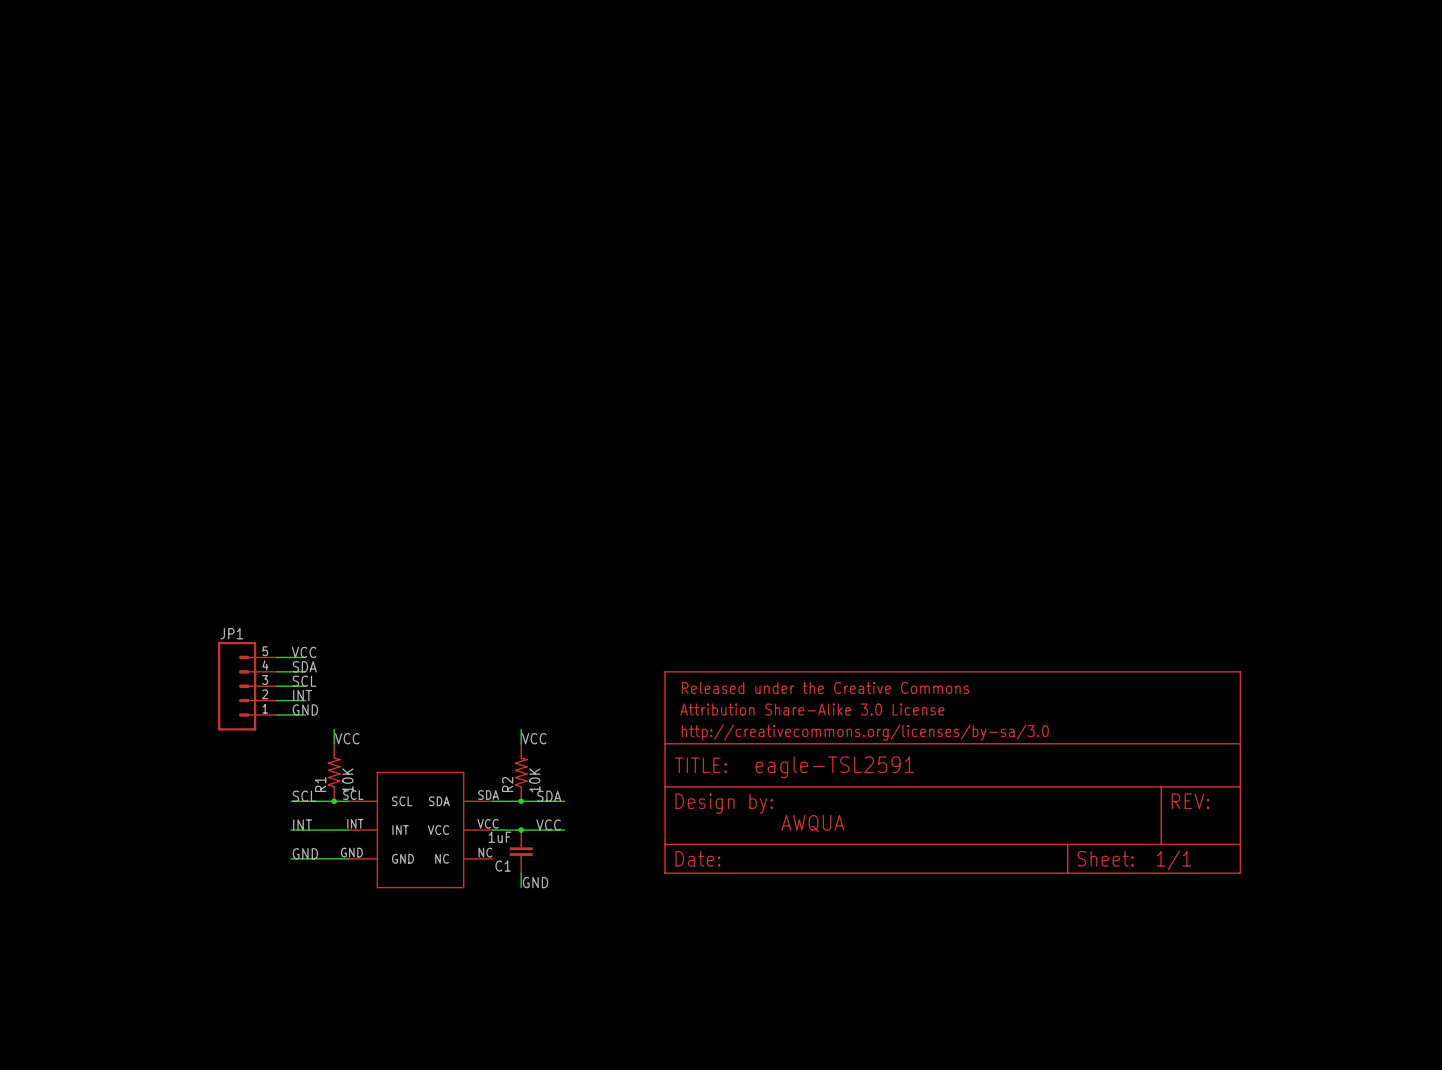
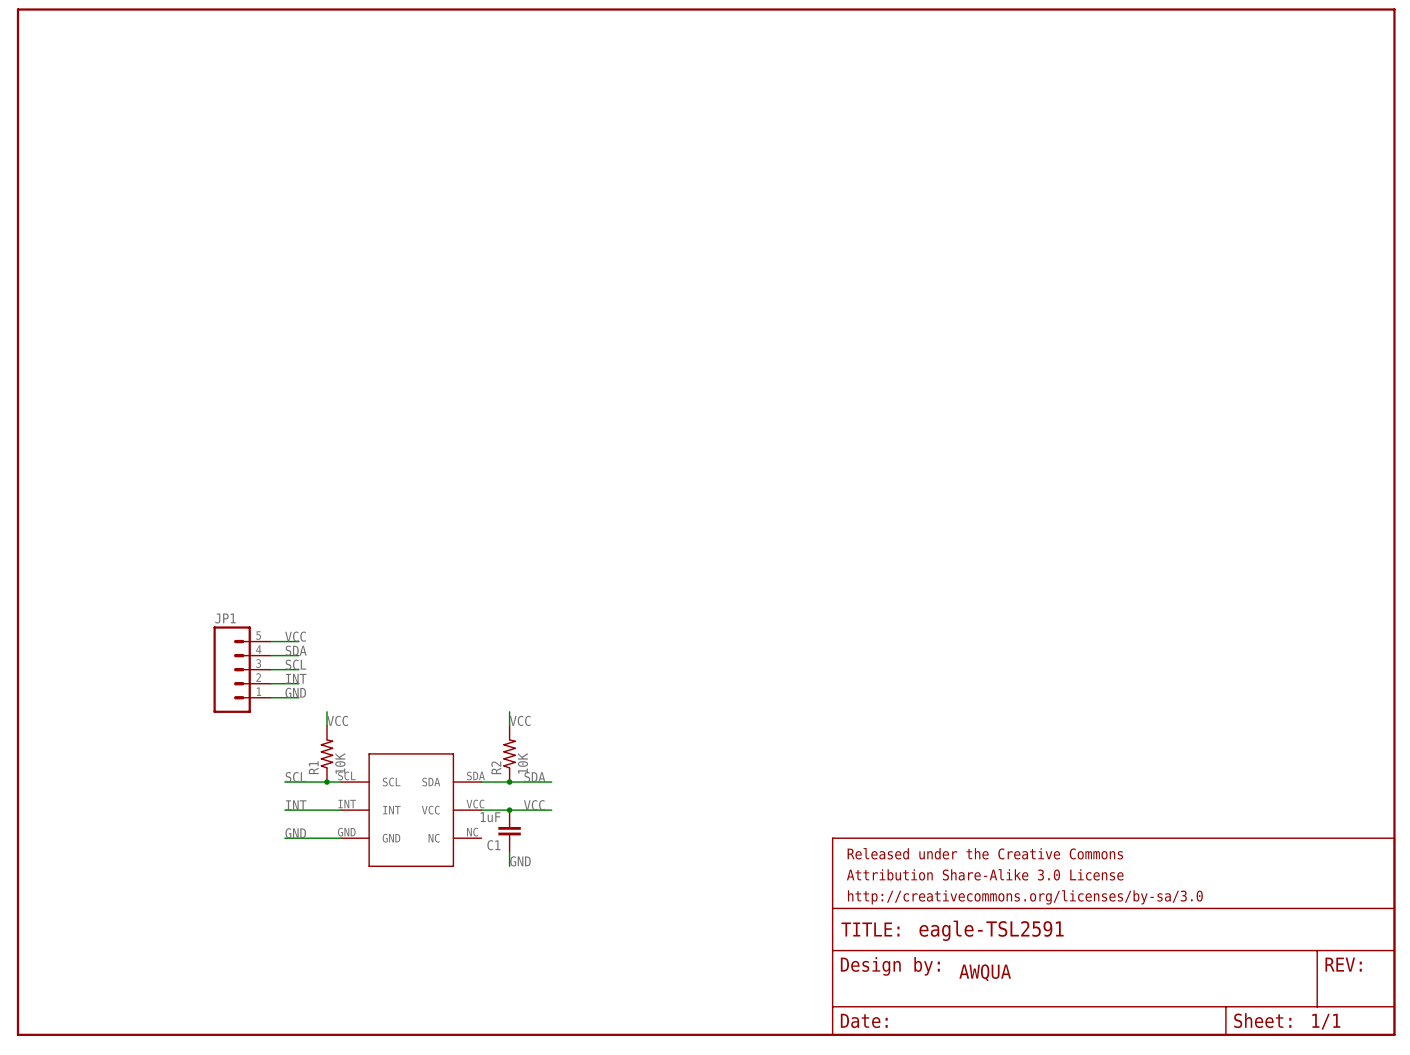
part: none -> (706, 522)
part: (952, 772) -> none
text: AWQUA (812, 823) -> none
part: none -> (1113, 936)
text: none -> AWQUA (985, 972)

